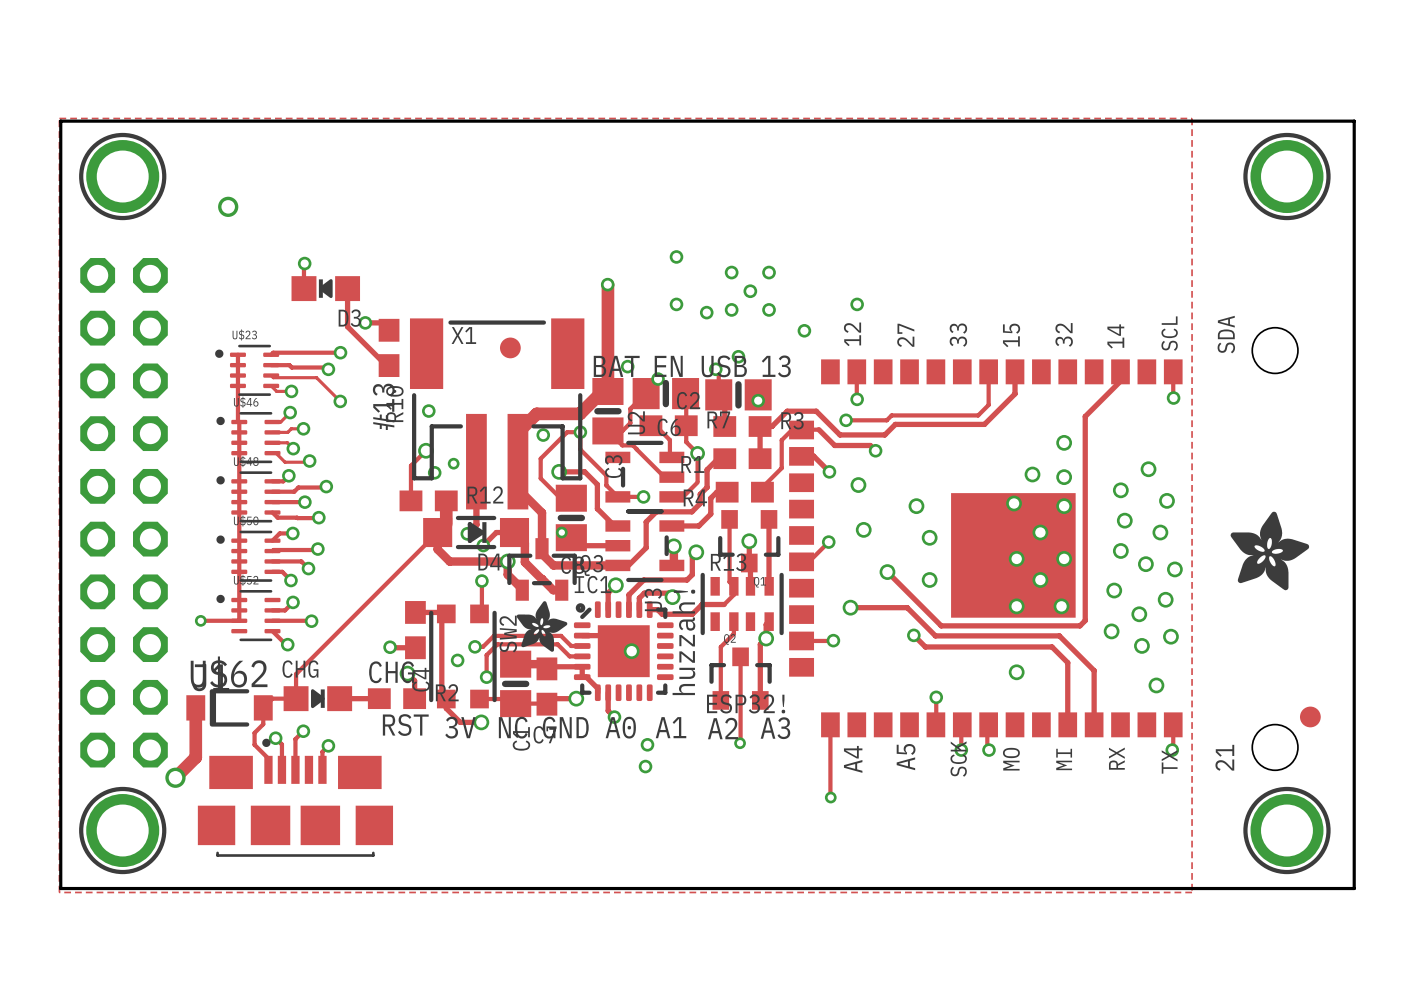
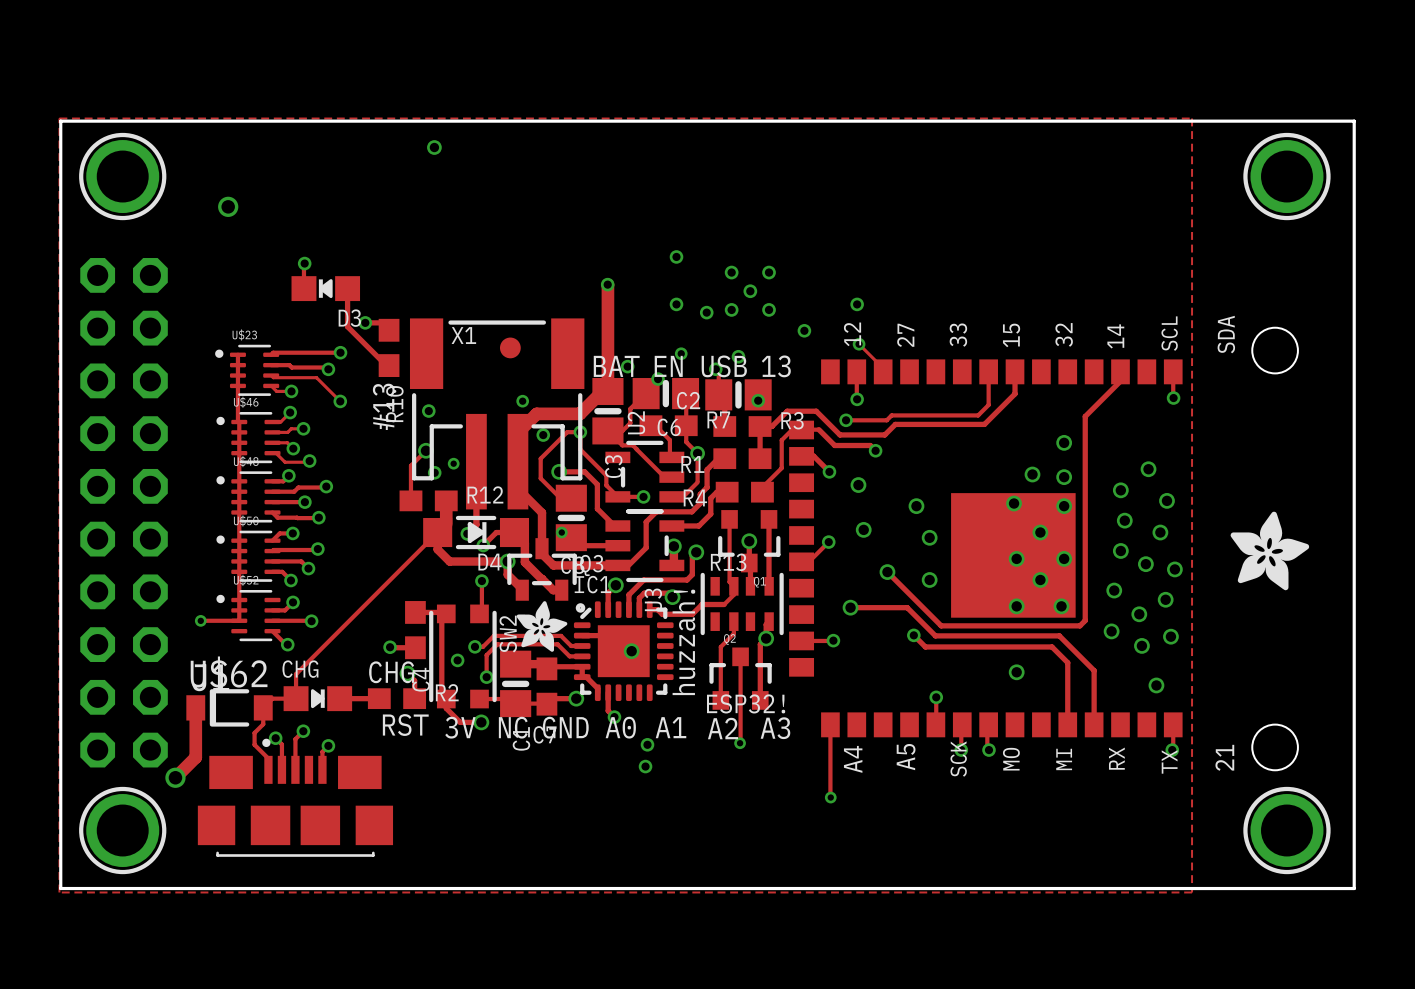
via: none -> (434, 147)
track: none -> (859, 344) (883, 368) (883, 371)
via: none -> (859, 344)
via: none -> (681, 353)
via: none -> (522, 401)
part: (1310, 716) -> none

